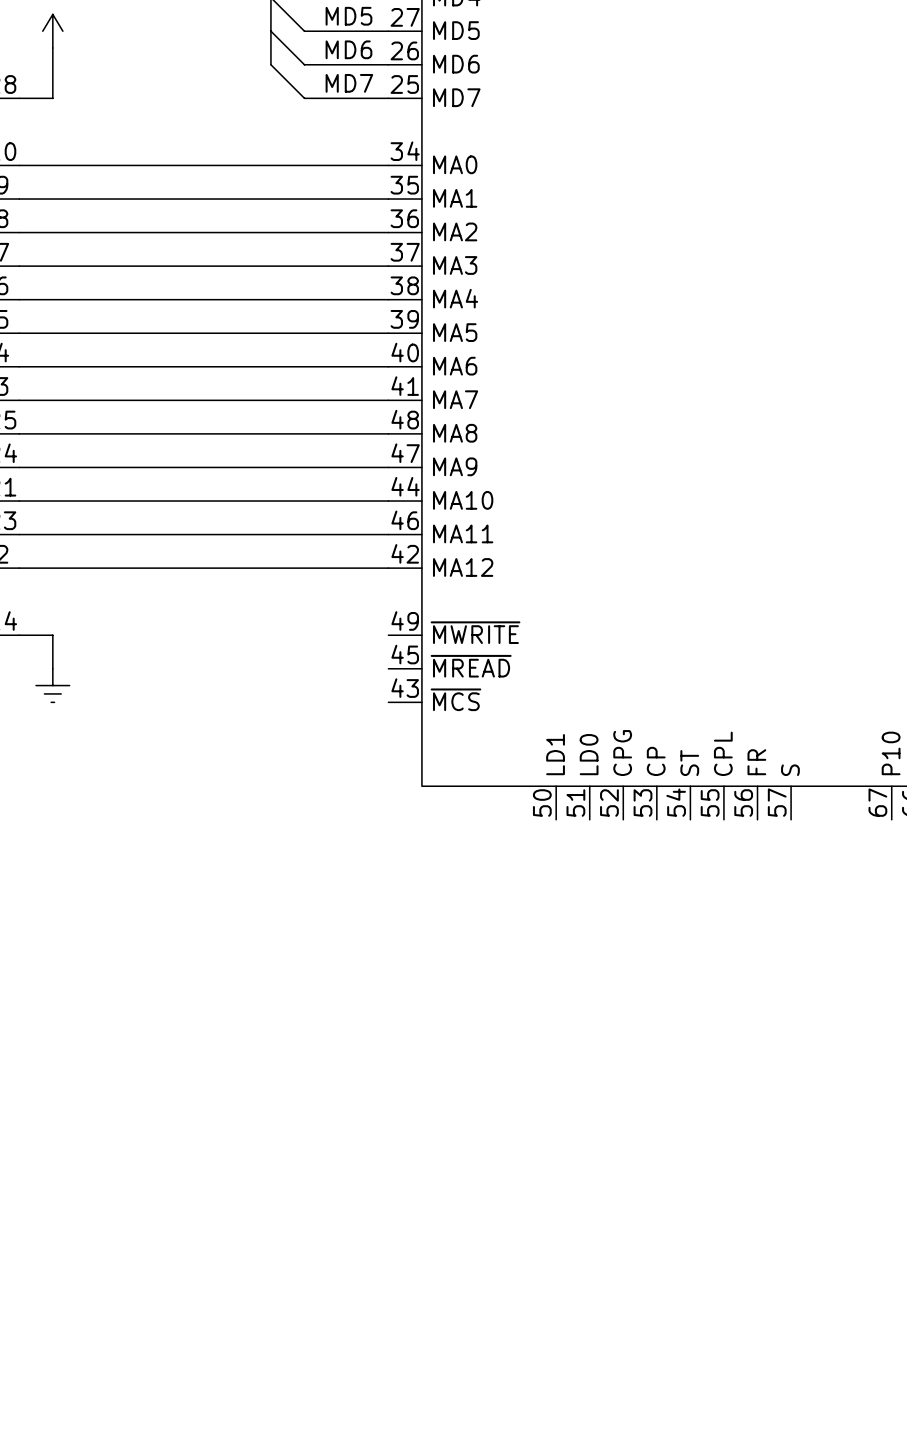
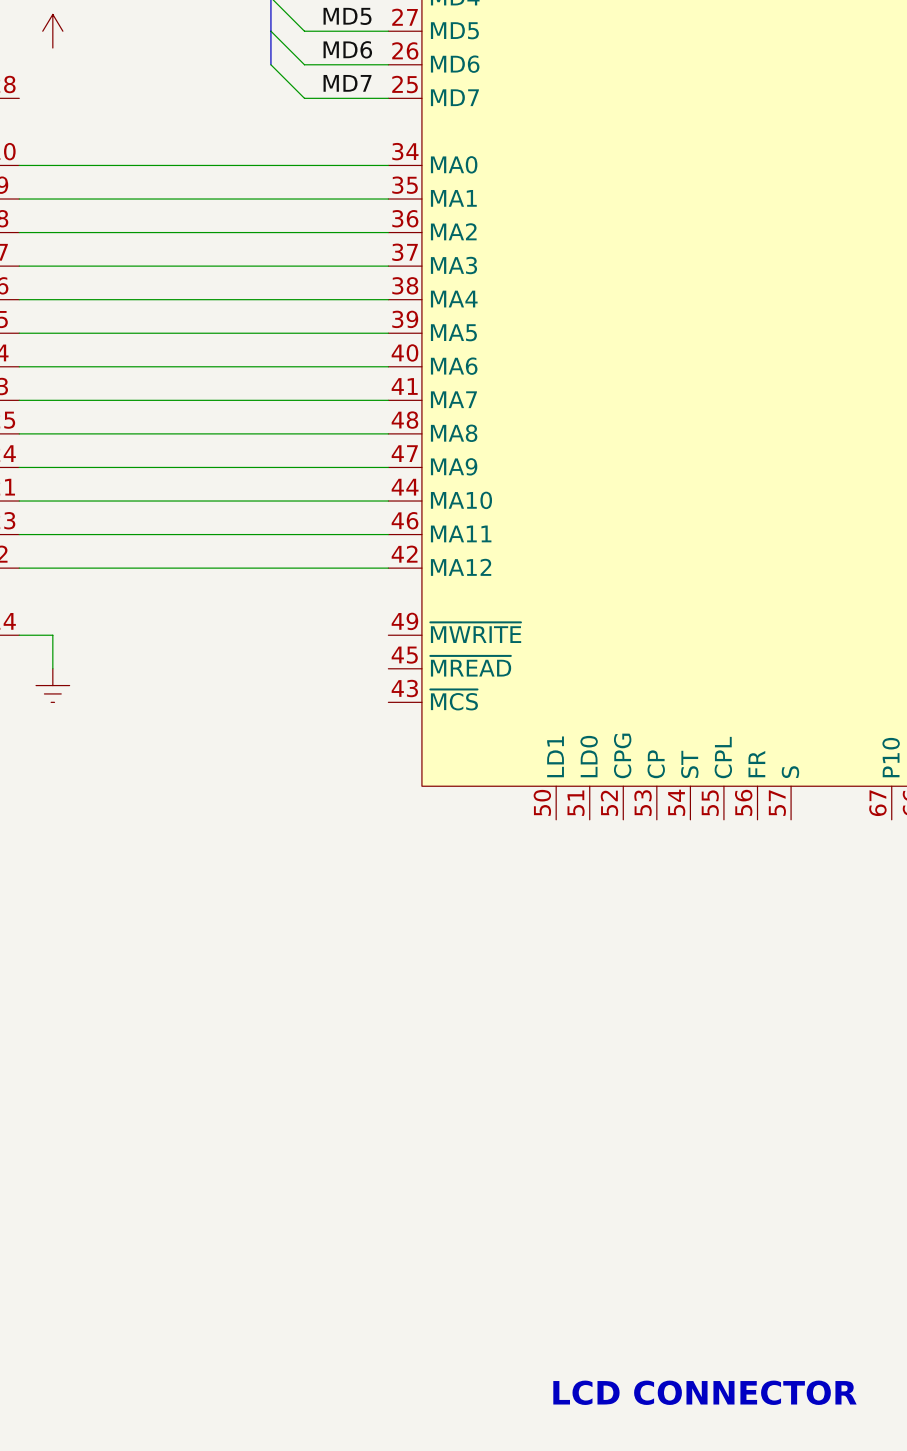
wire: (52, 48) (52, 98) (19, 98) -> none
text: none -> LCD CONNECTOR (704, 1392)

